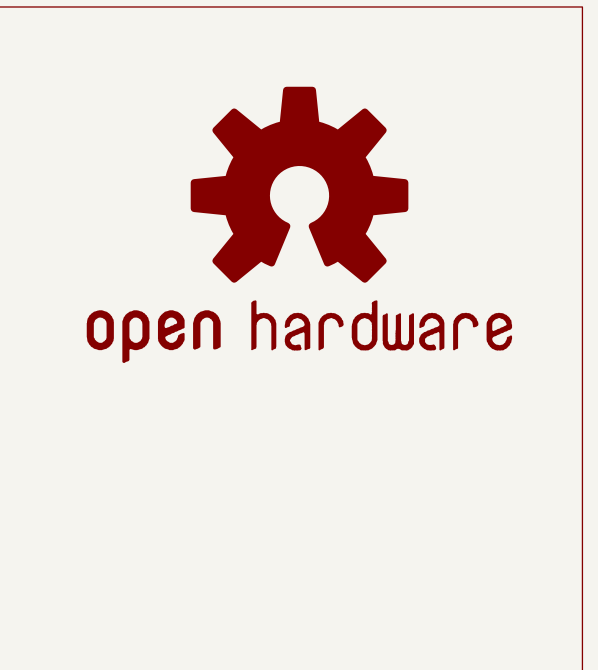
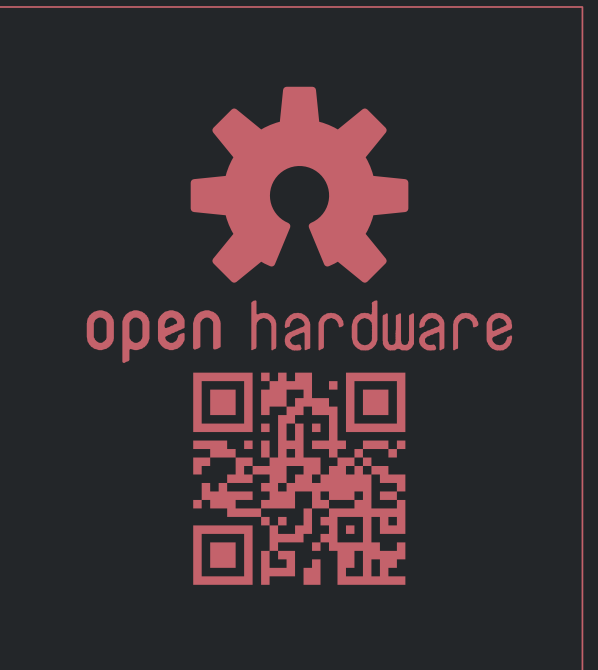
part: none -> (299, 478)

